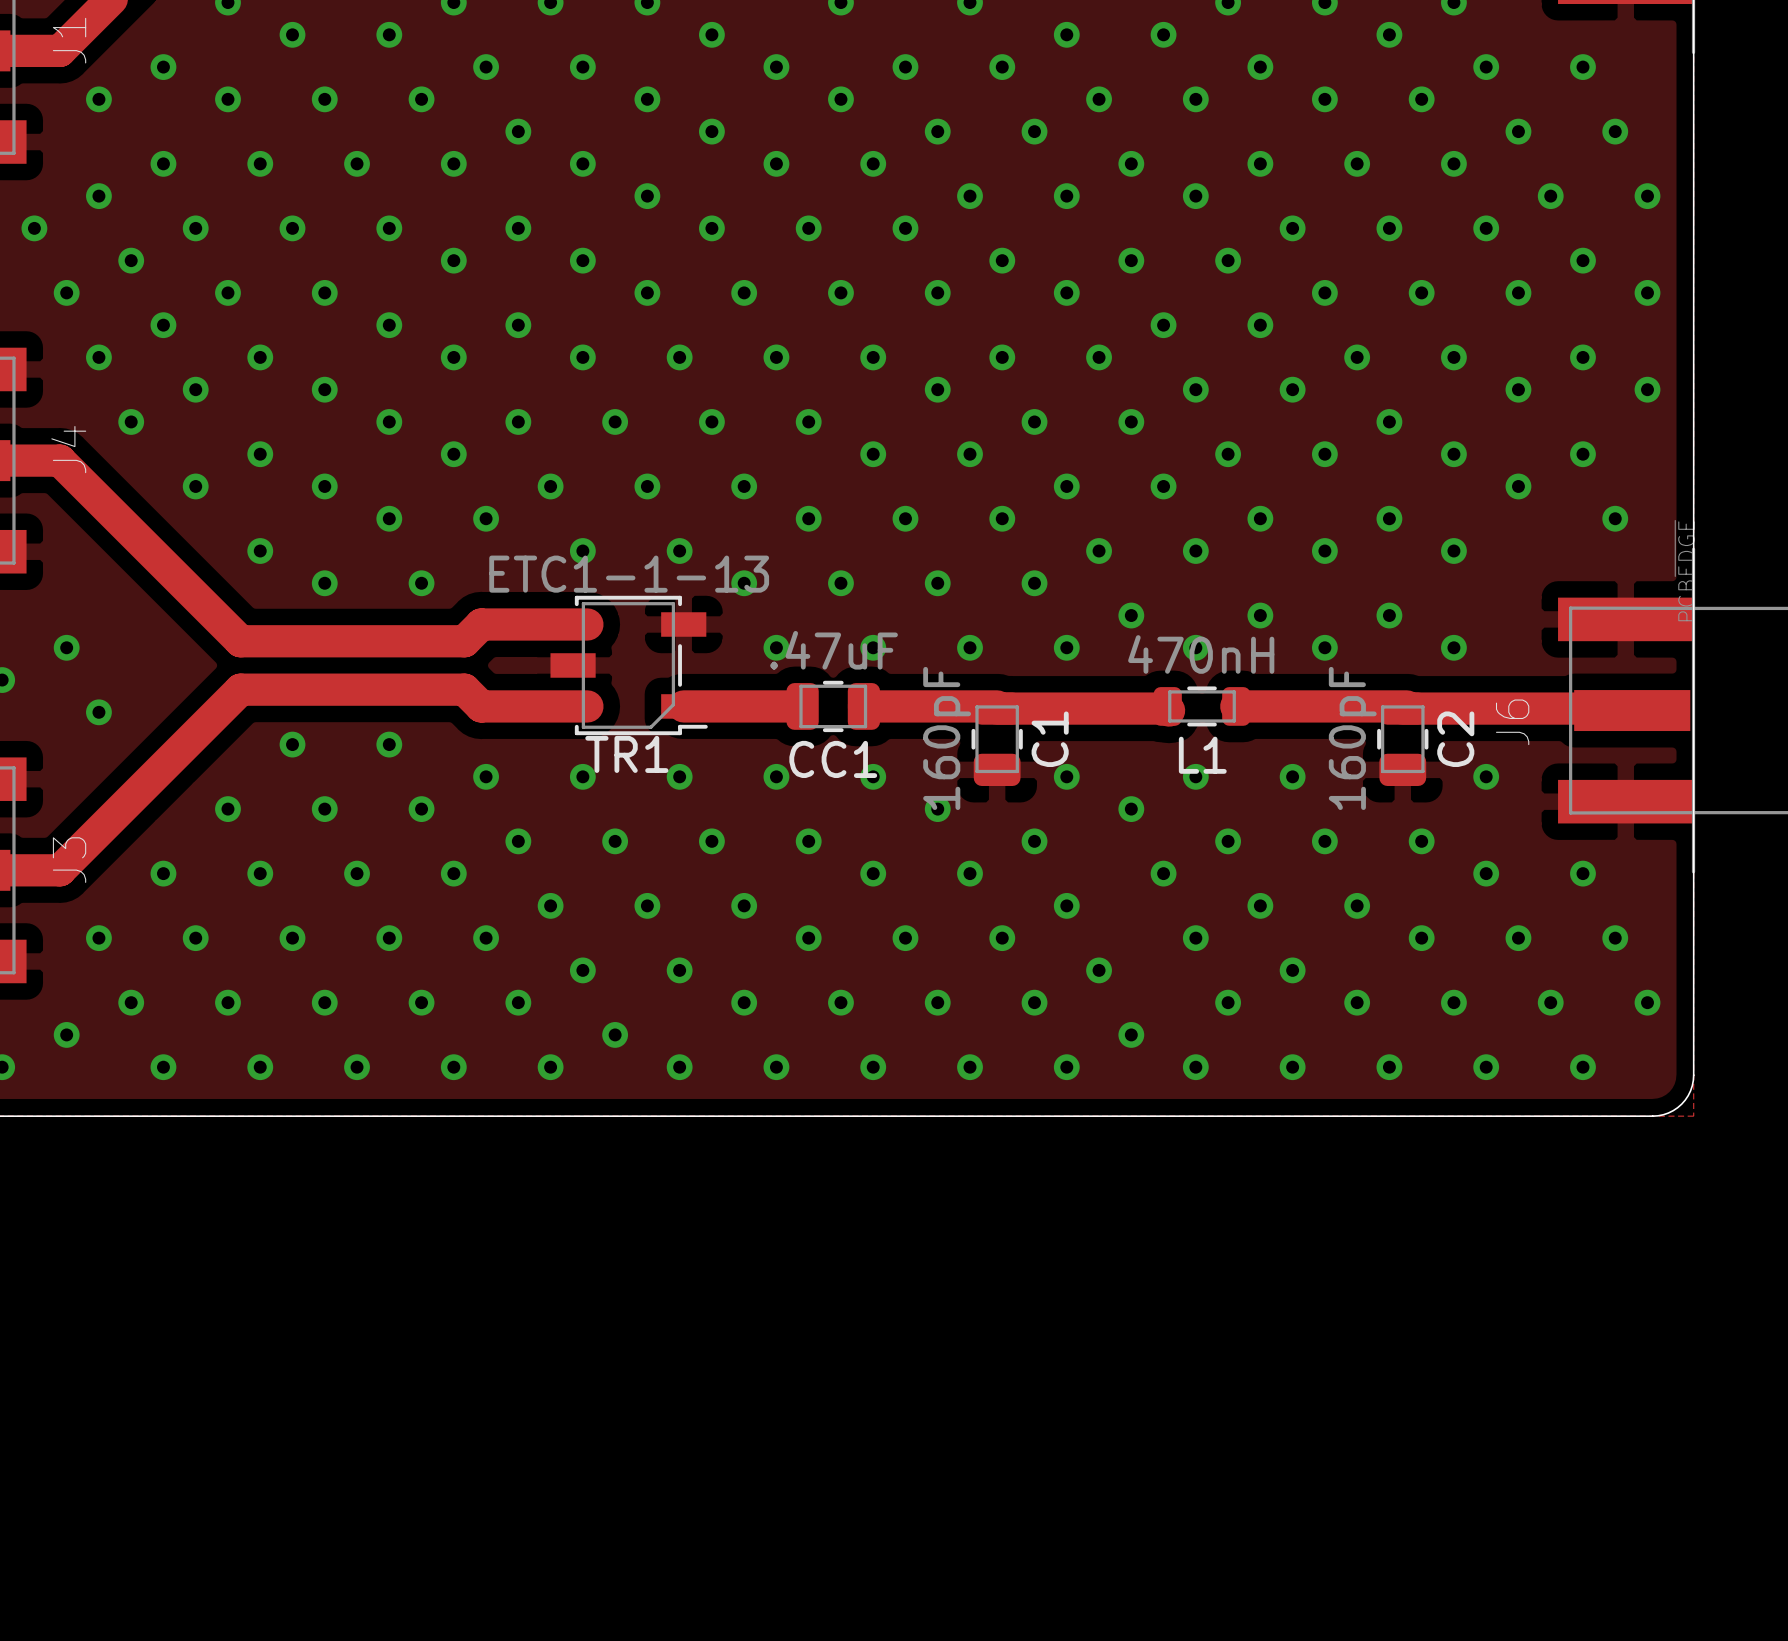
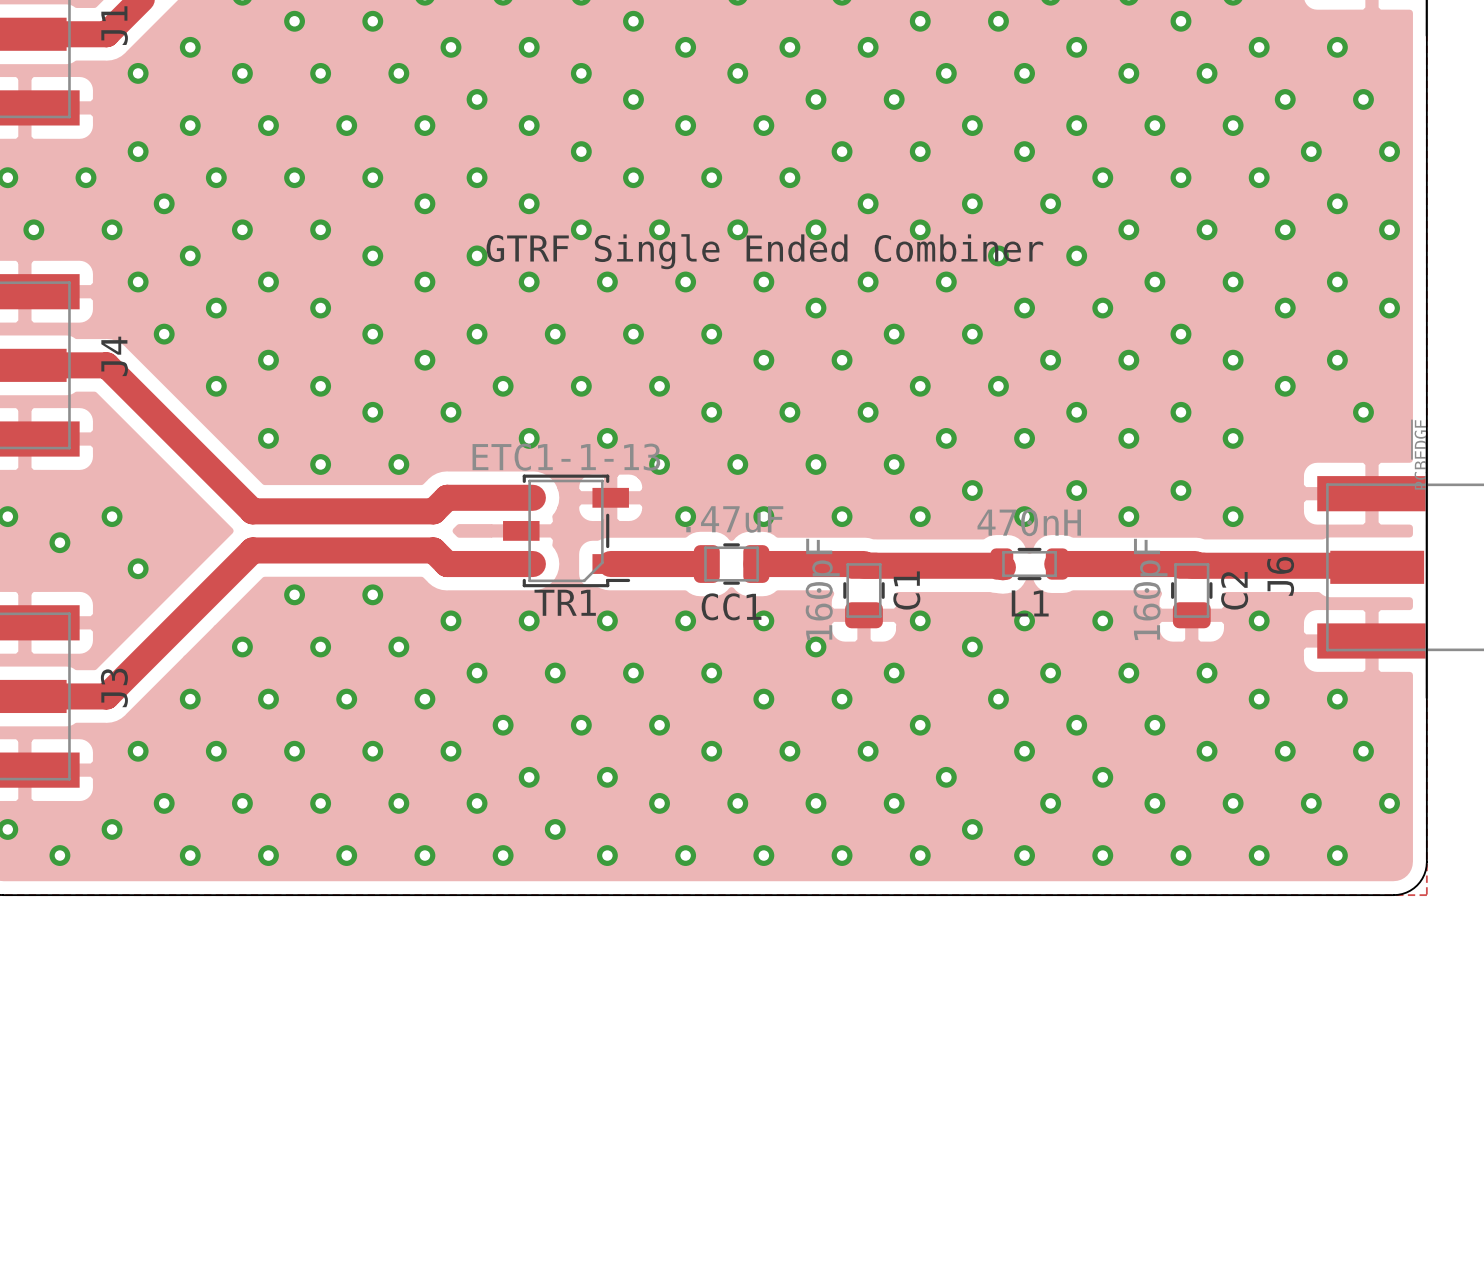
text: none -> GTRF Single Ended Combiner (764, 251)

